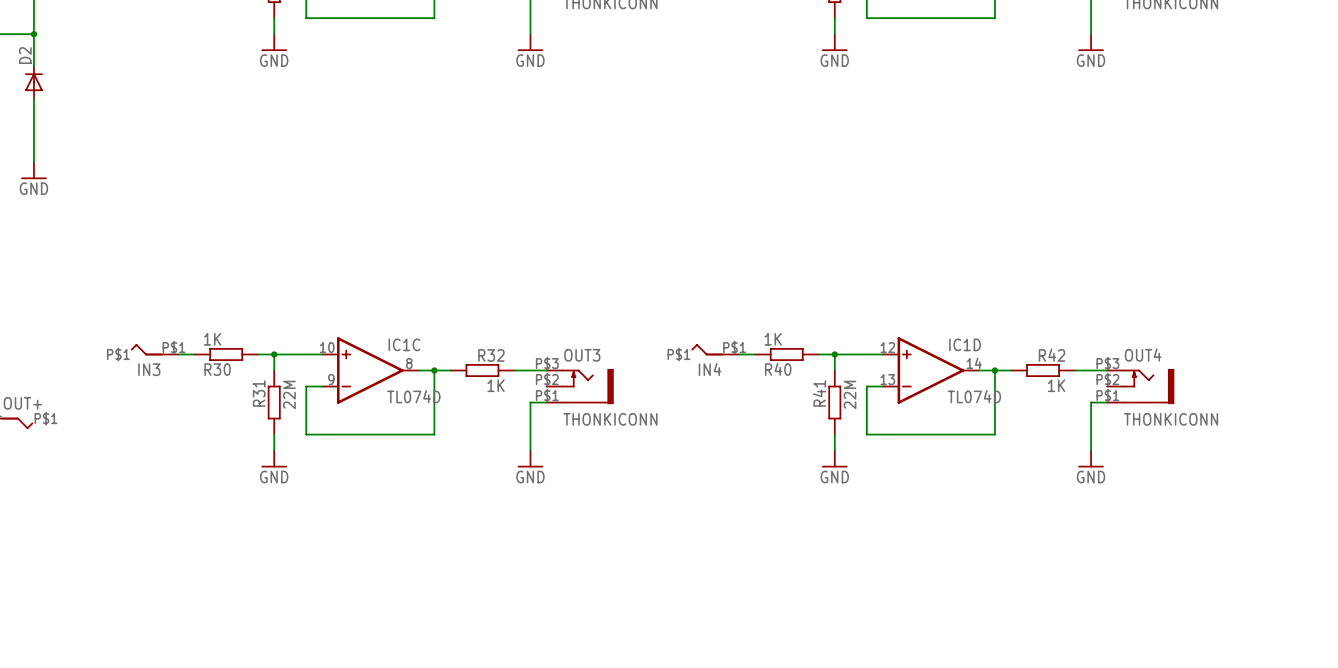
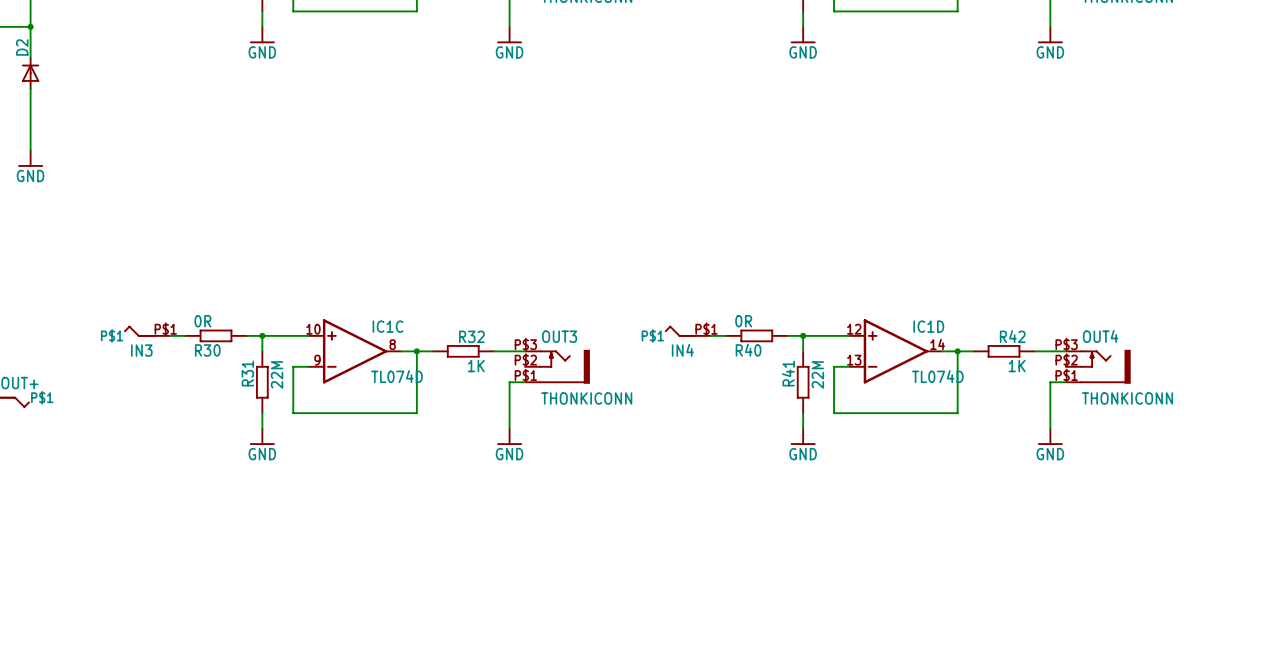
R30 value: 1K (212, 339) -> 0R (202, 321)
R40 value: 1K (773, 339) -> 0R (743, 321)

